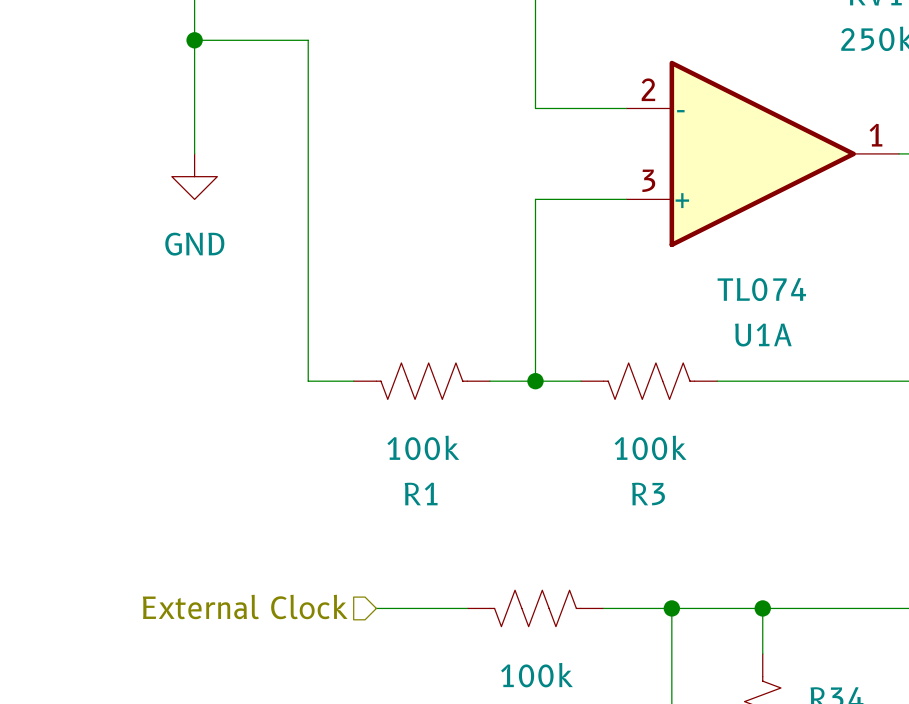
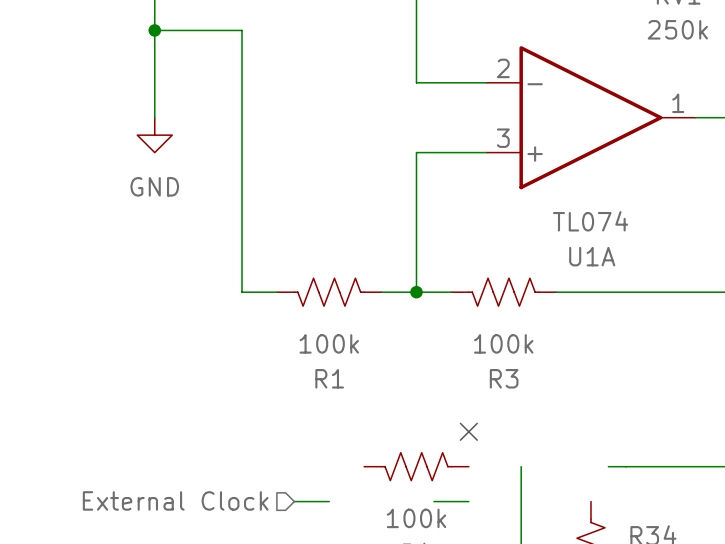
no-connect mark: none -> (468, 431)
hierarchical label position: External Clock (245, 606) -> External Clock (175, 500)
wire: (376, 608) (467, 608) -> none
wire: (603, 608) (785, 608) -> none
junction: (671, 608) -> none
wire: (762, 608) (762, 653) -> none
junction: (762, 608) -> none
wire: none -> (294, 501) (329, 501)
wire: none -> (433, 501) (468, 501)

